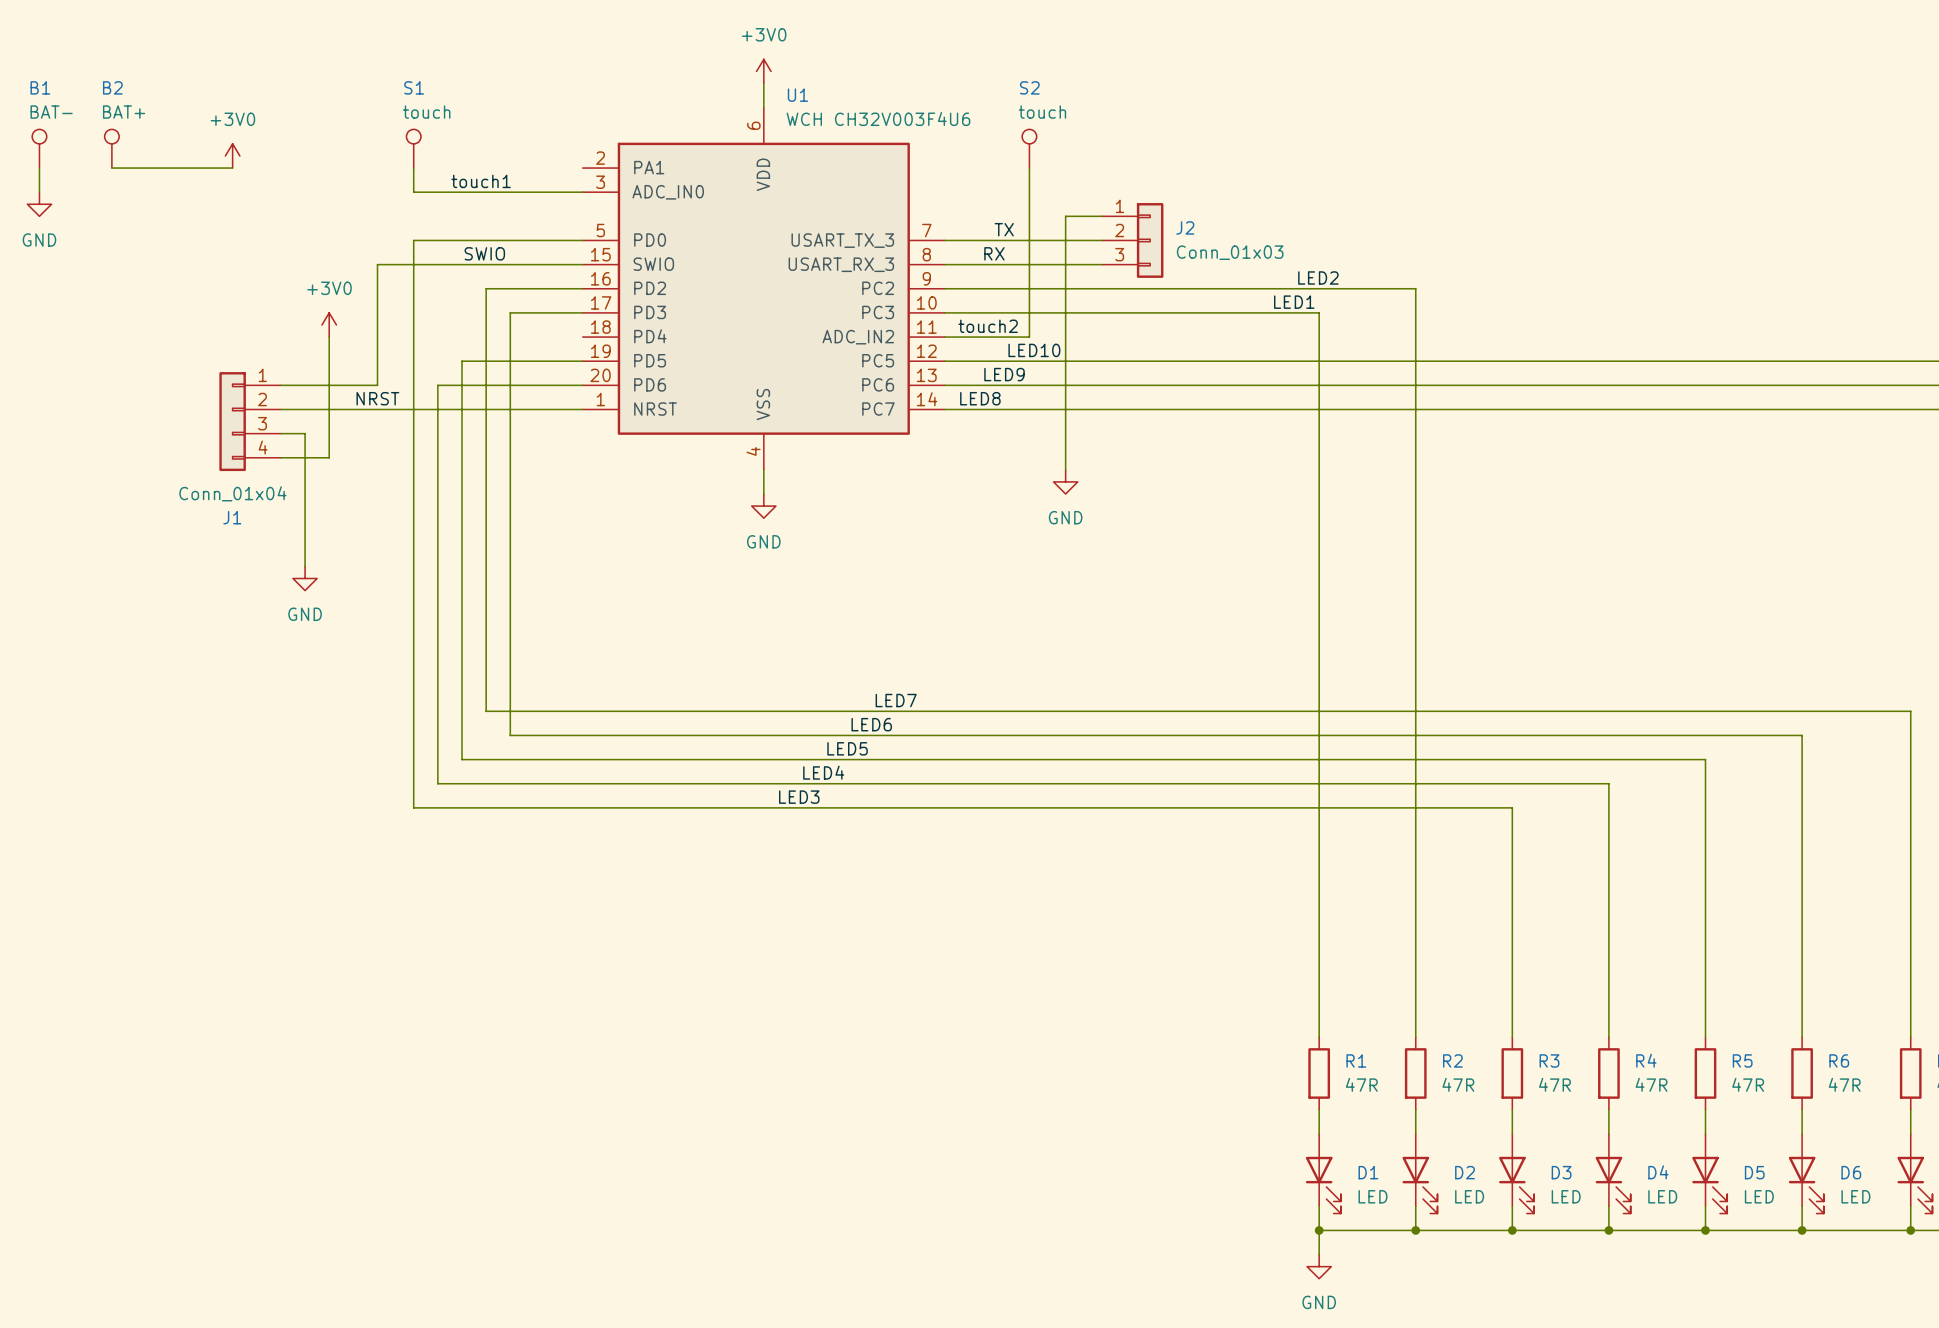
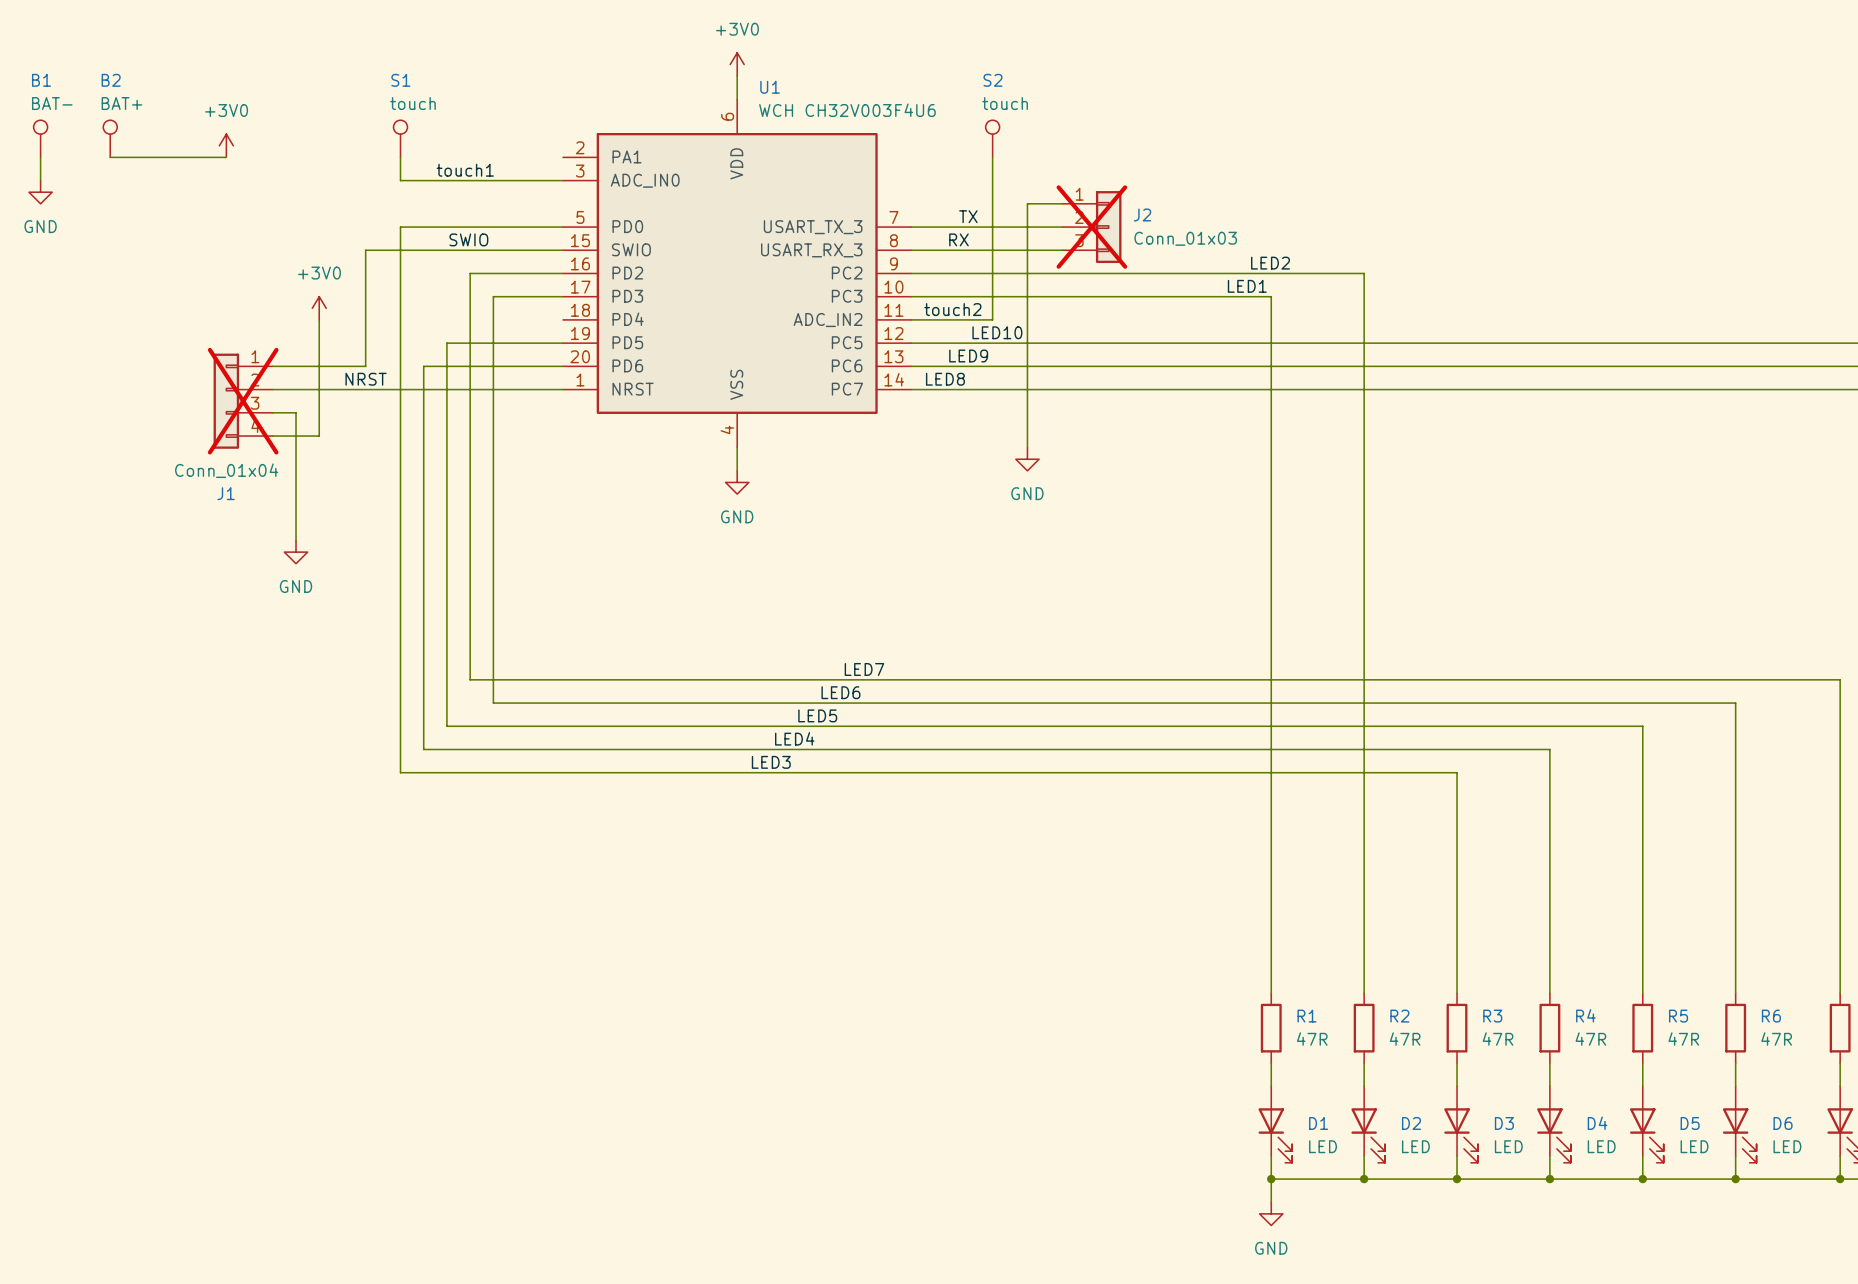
J2 do-not-place cross: none -> (1091, 227)
J1 do-not-place cross: none -> (243, 401)

